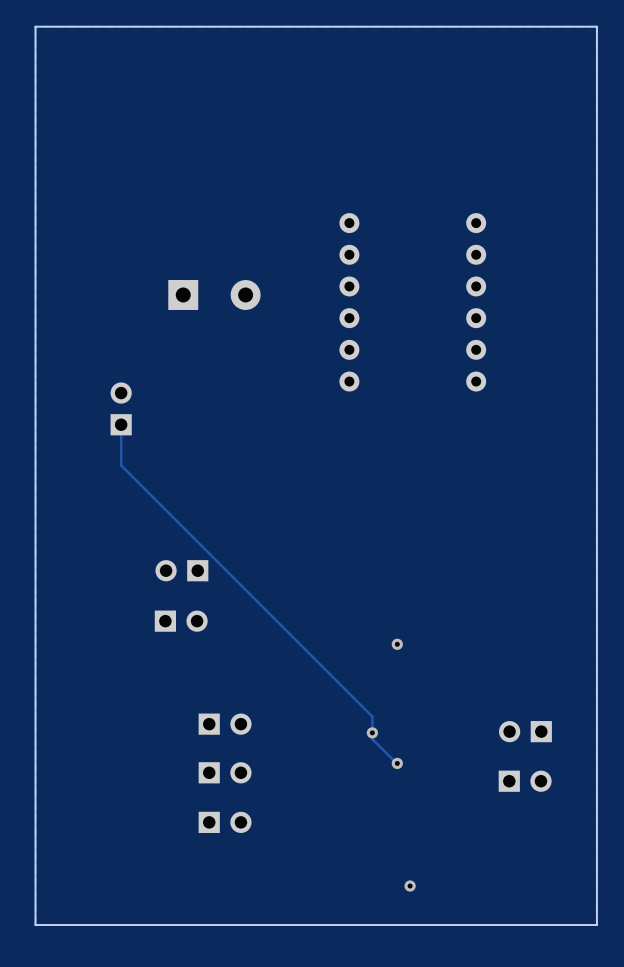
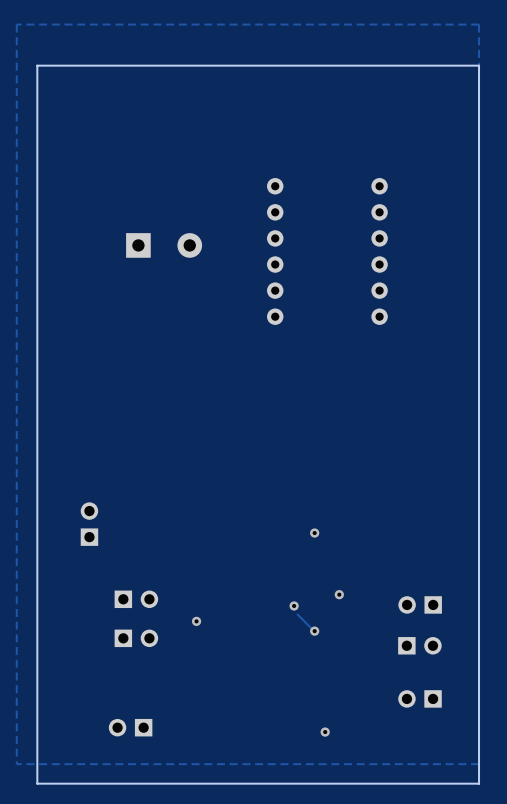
board edge: (596, 76) (596, 26) (35, 26) (35, 925) (596, 925) -> (479, 65) (37, 65) (37, 783) (479, 783) (479, 764)
part: (121, 408) -> none
track: (121, 424) (121, 465) (372, 716) (372, 739) (376, 743) -> none
part: (181, 570) -> none
part: (181, 621) -> none
part: none -> (89, 524)
via: none -> (339, 594)
part: none -> (136, 599)
part: (225, 724) -> none
via: none -> (196, 621)
part: none -> (136, 638)
part: (225, 772) -> none
part: (225, 822) -> none
part: none -> (420, 698)
part: none -> (130, 727)

